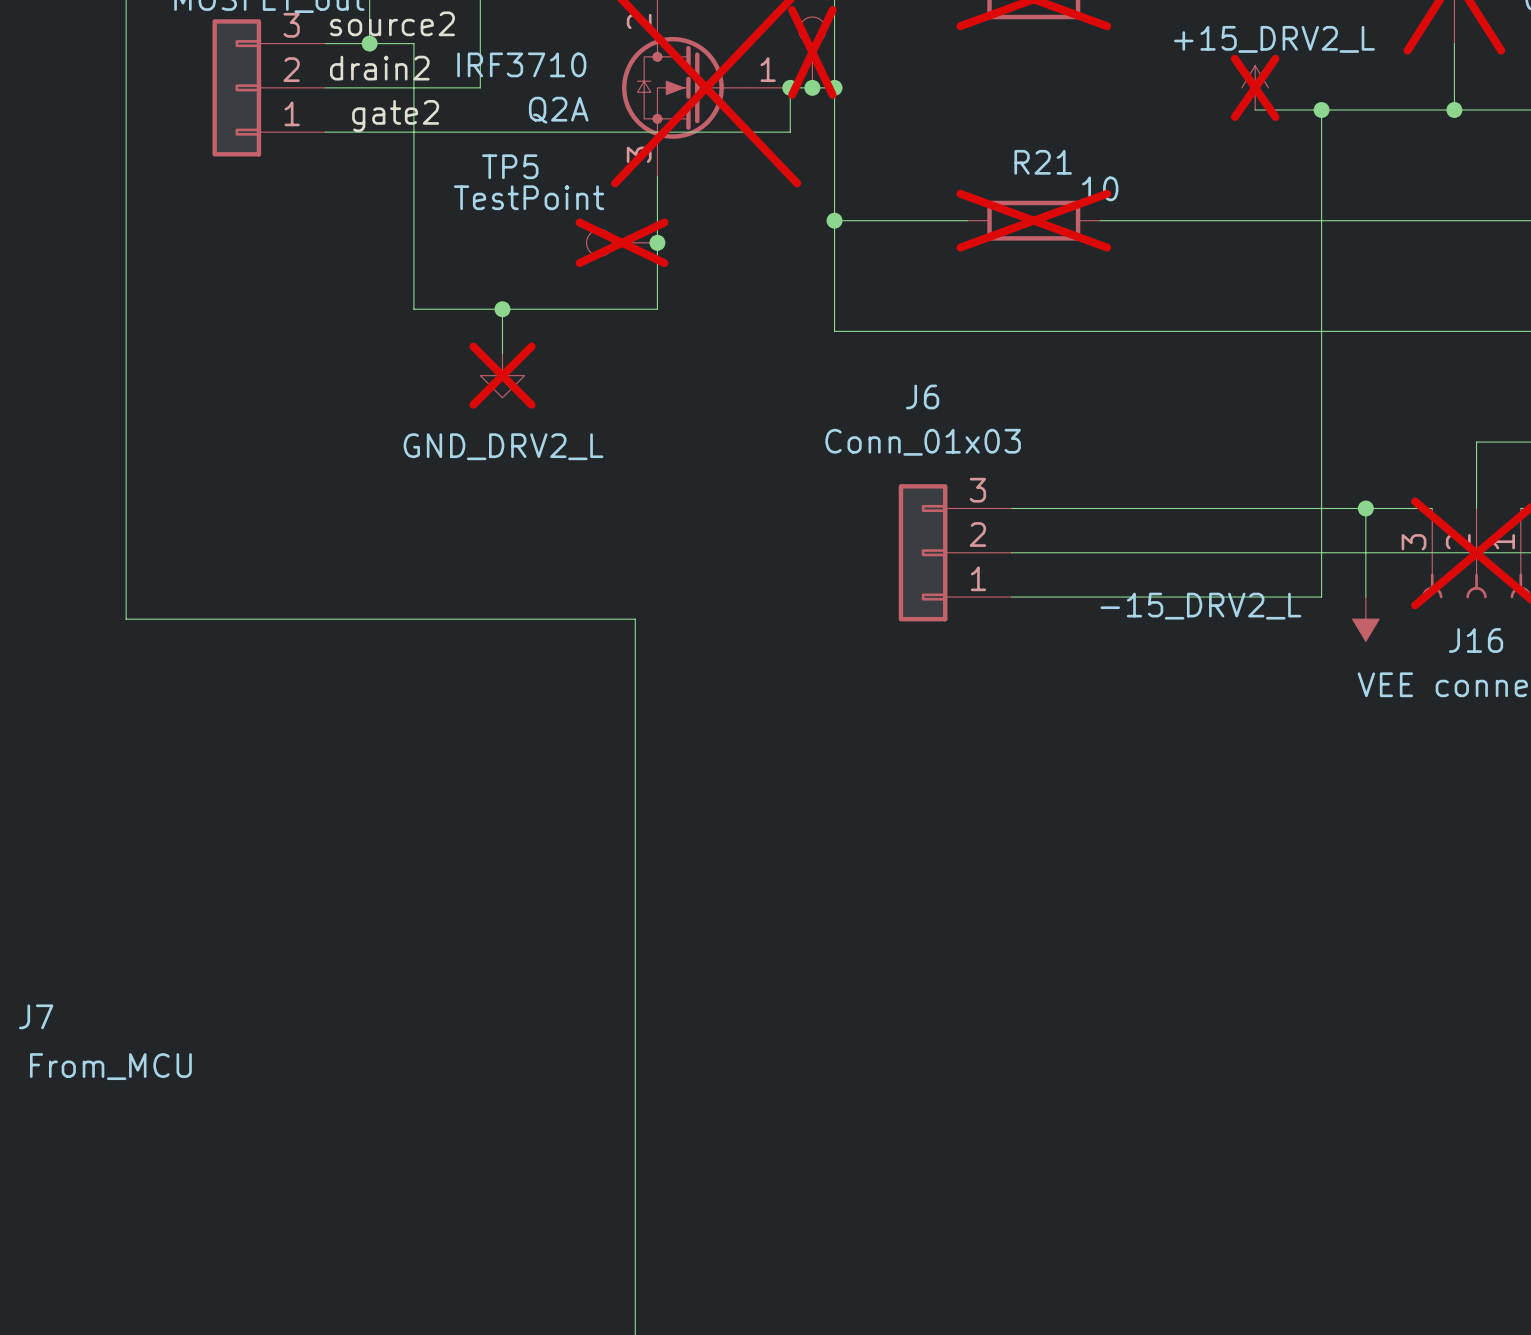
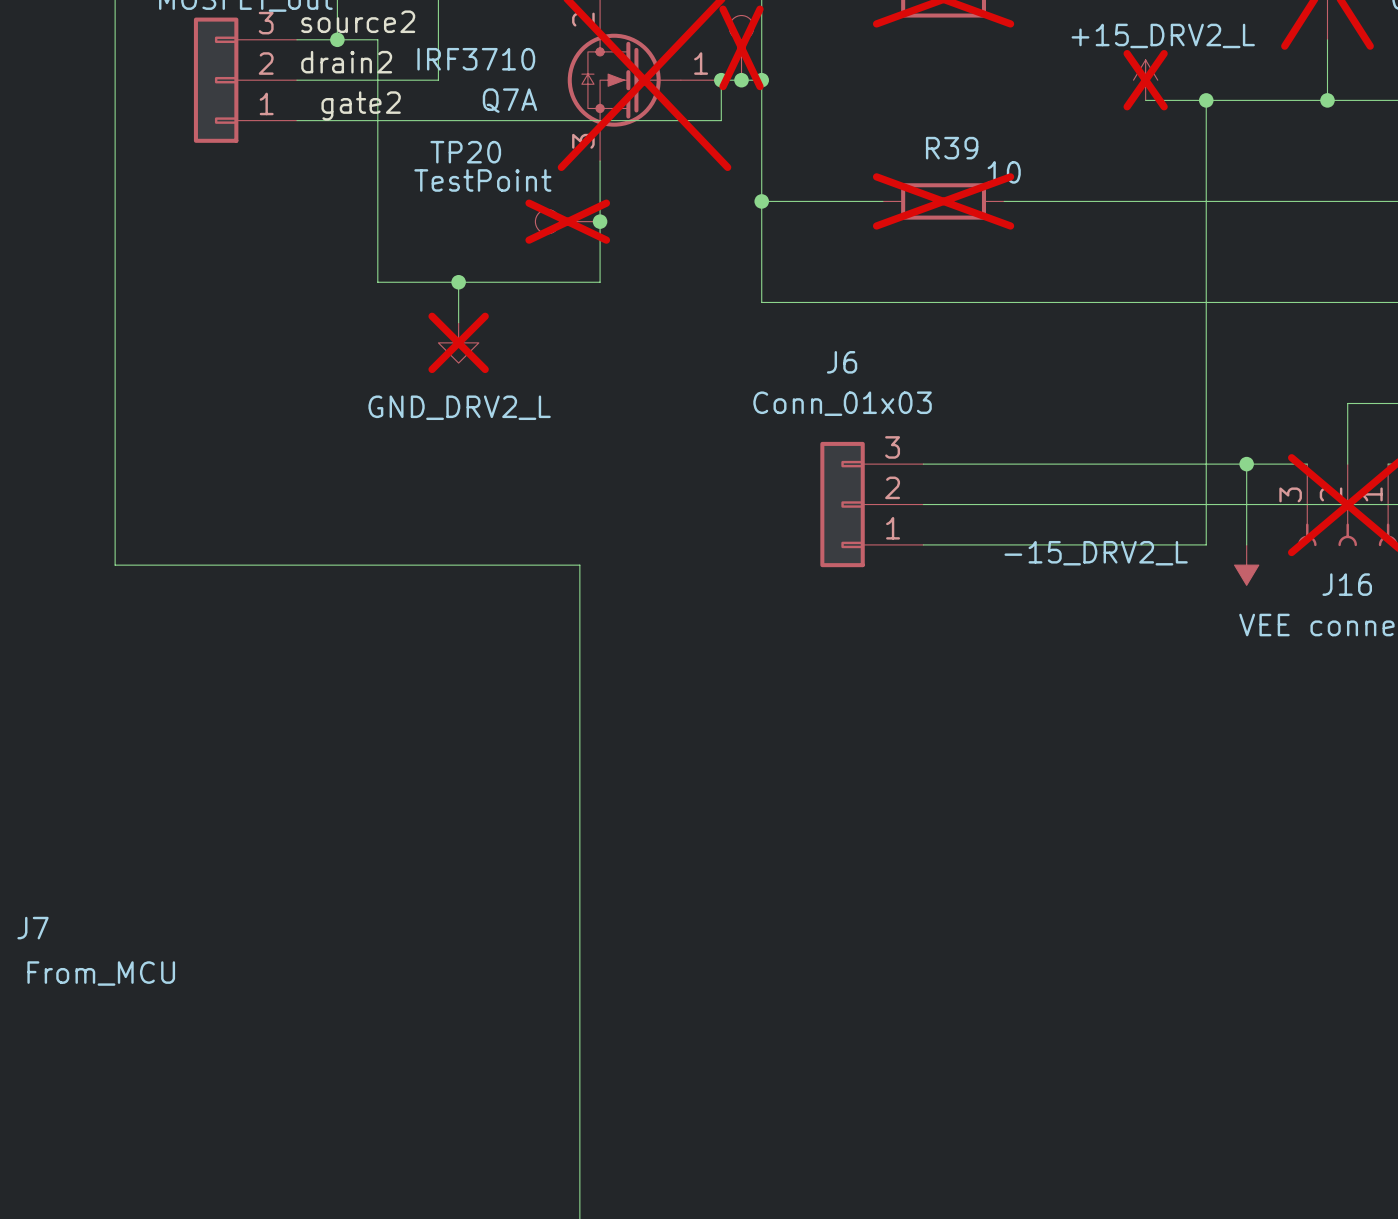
Q2A name: Q2A (558, 110) -> Q7A (509, 100)
R21 name: R21 (1043, 162) -> R39 (952, 148)
TP5 name: TP5 (510, 166) -> TP20 (465, 152)

